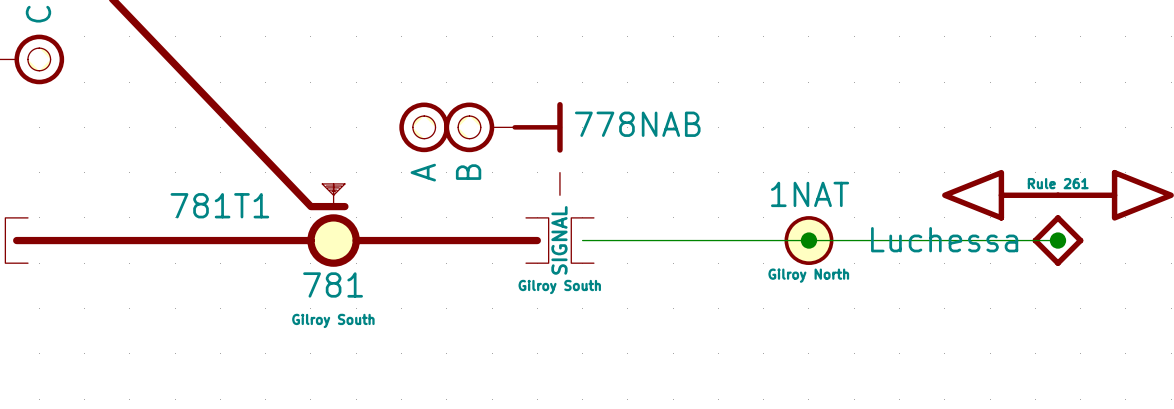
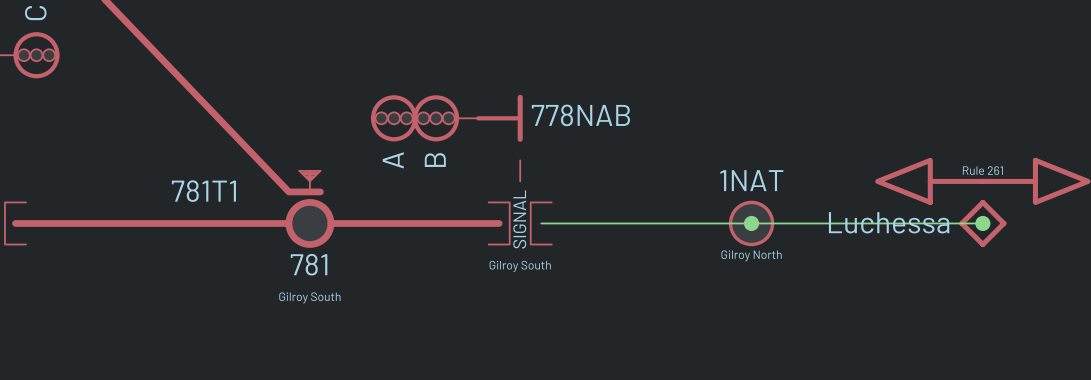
part symbol: [14, 34, 65, 85] -> [13, 32, 60, 79]
part symbol: [399, 102, 449, 153] -> [370, 95, 418, 142]
part symbol: [444, 102, 495, 153] -> [413, 95, 460, 142]

